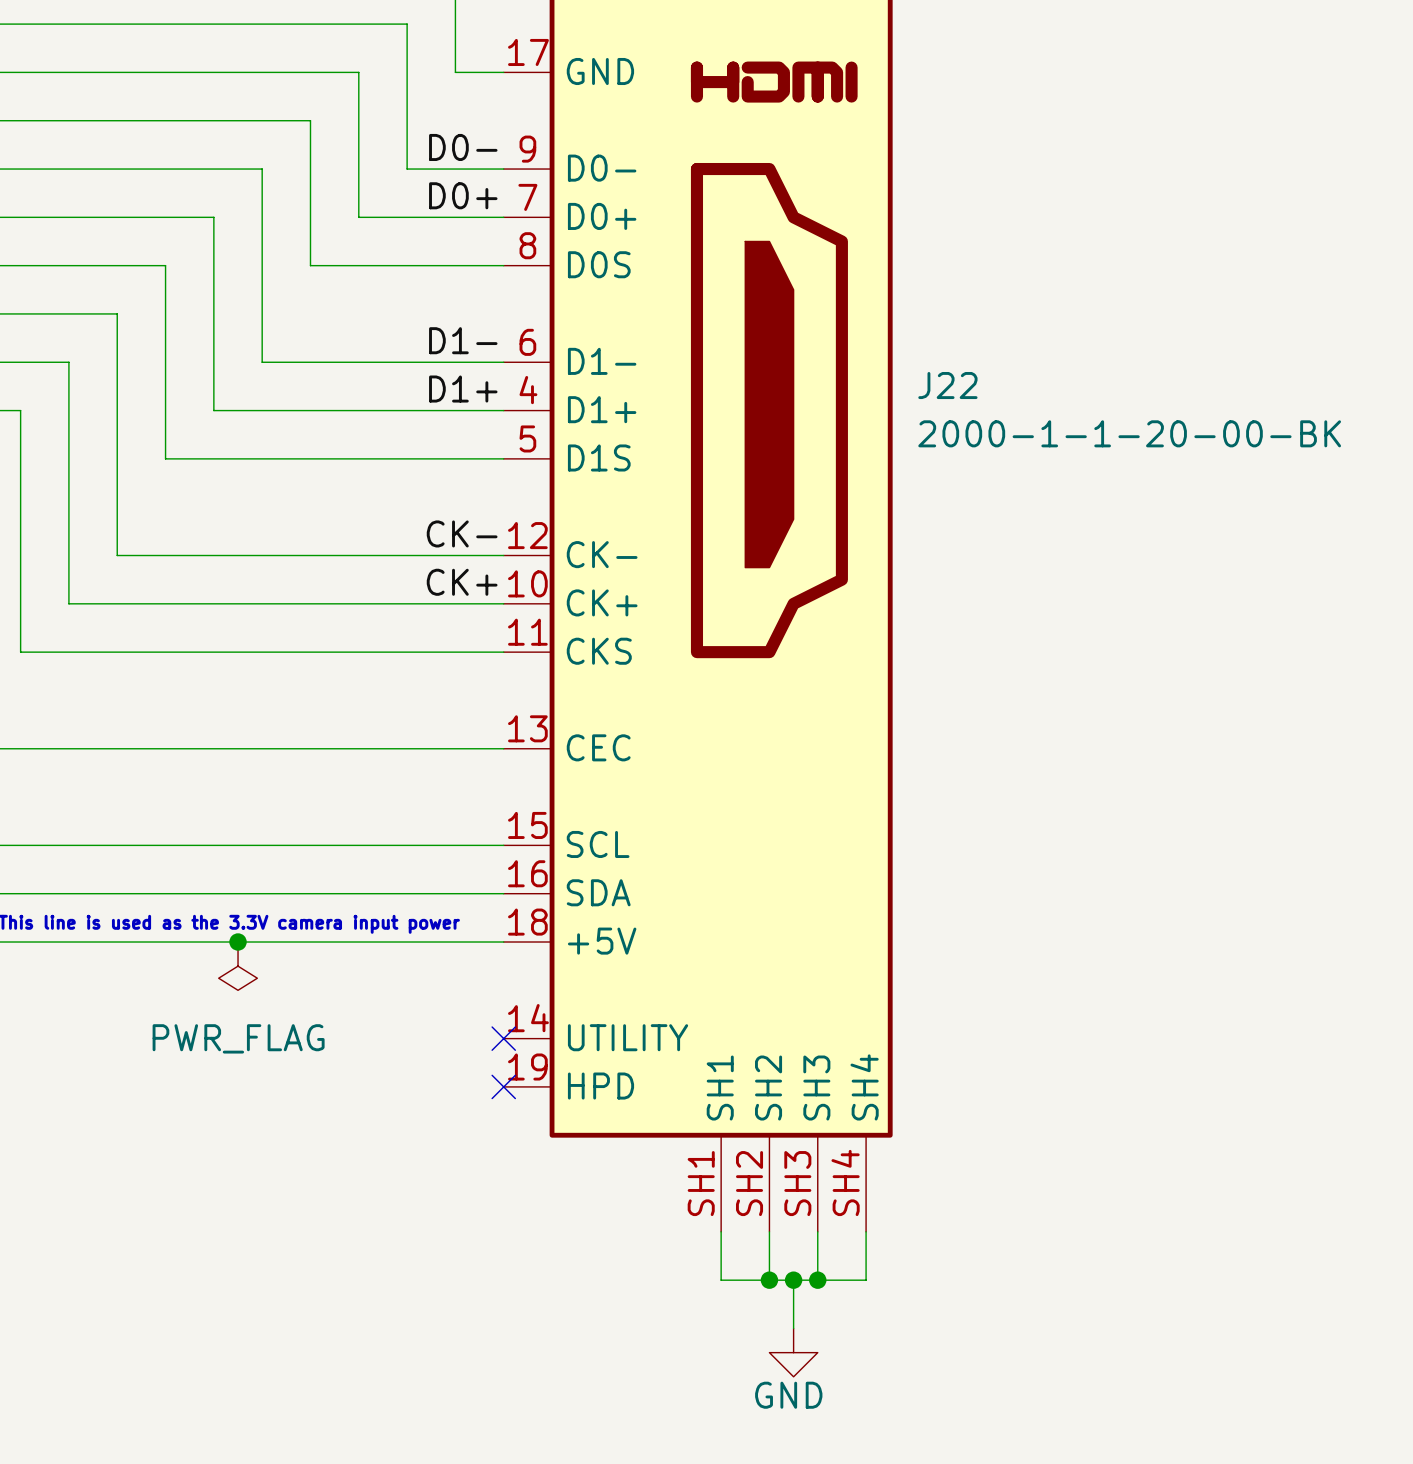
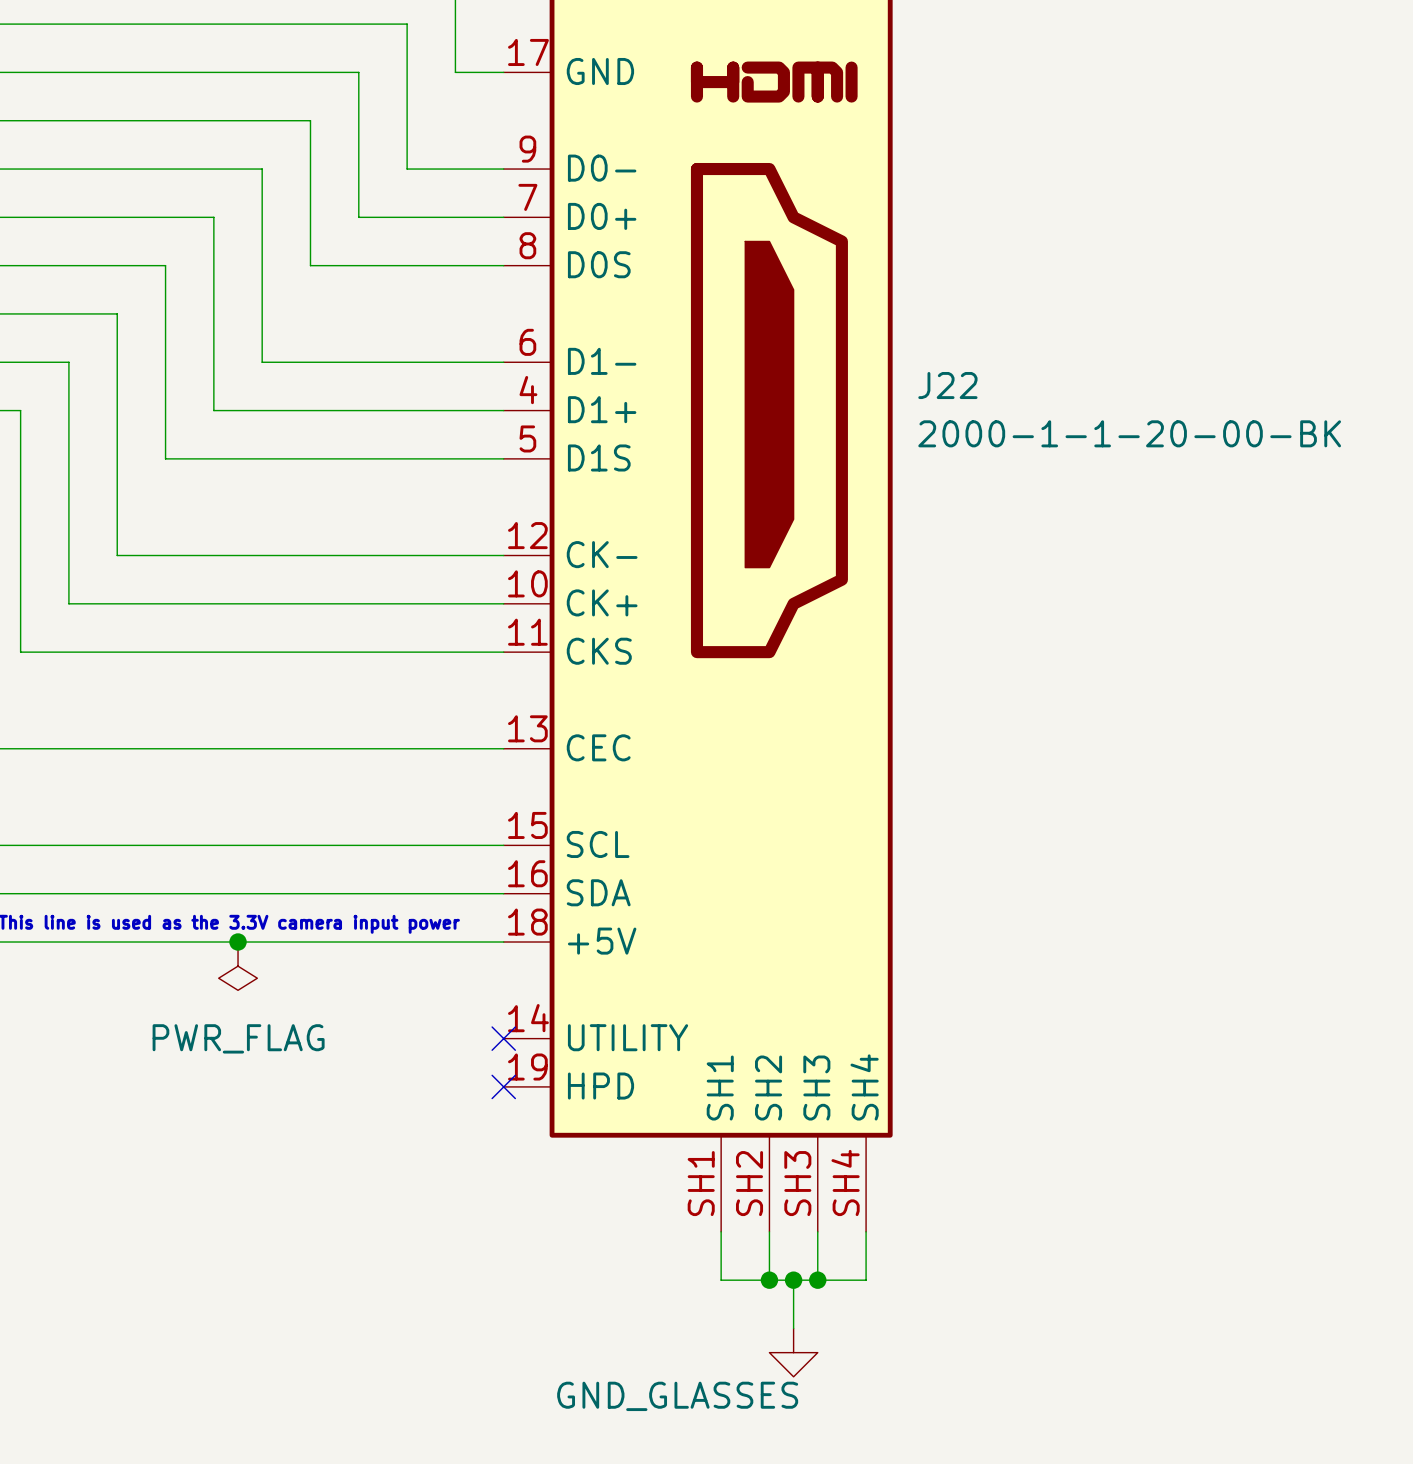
label: D0- (463, 147) -> none
label: D0+ (463, 195) -> none
label: D1- (463, 340) -> none
label: D1+ (463, 389) -> none
label: CK- (462, 533) -> none
label: CK+ (462, 582) -> none
power symbol: GND (793, 1352) -> GND_GLASSES (793, 1352)

